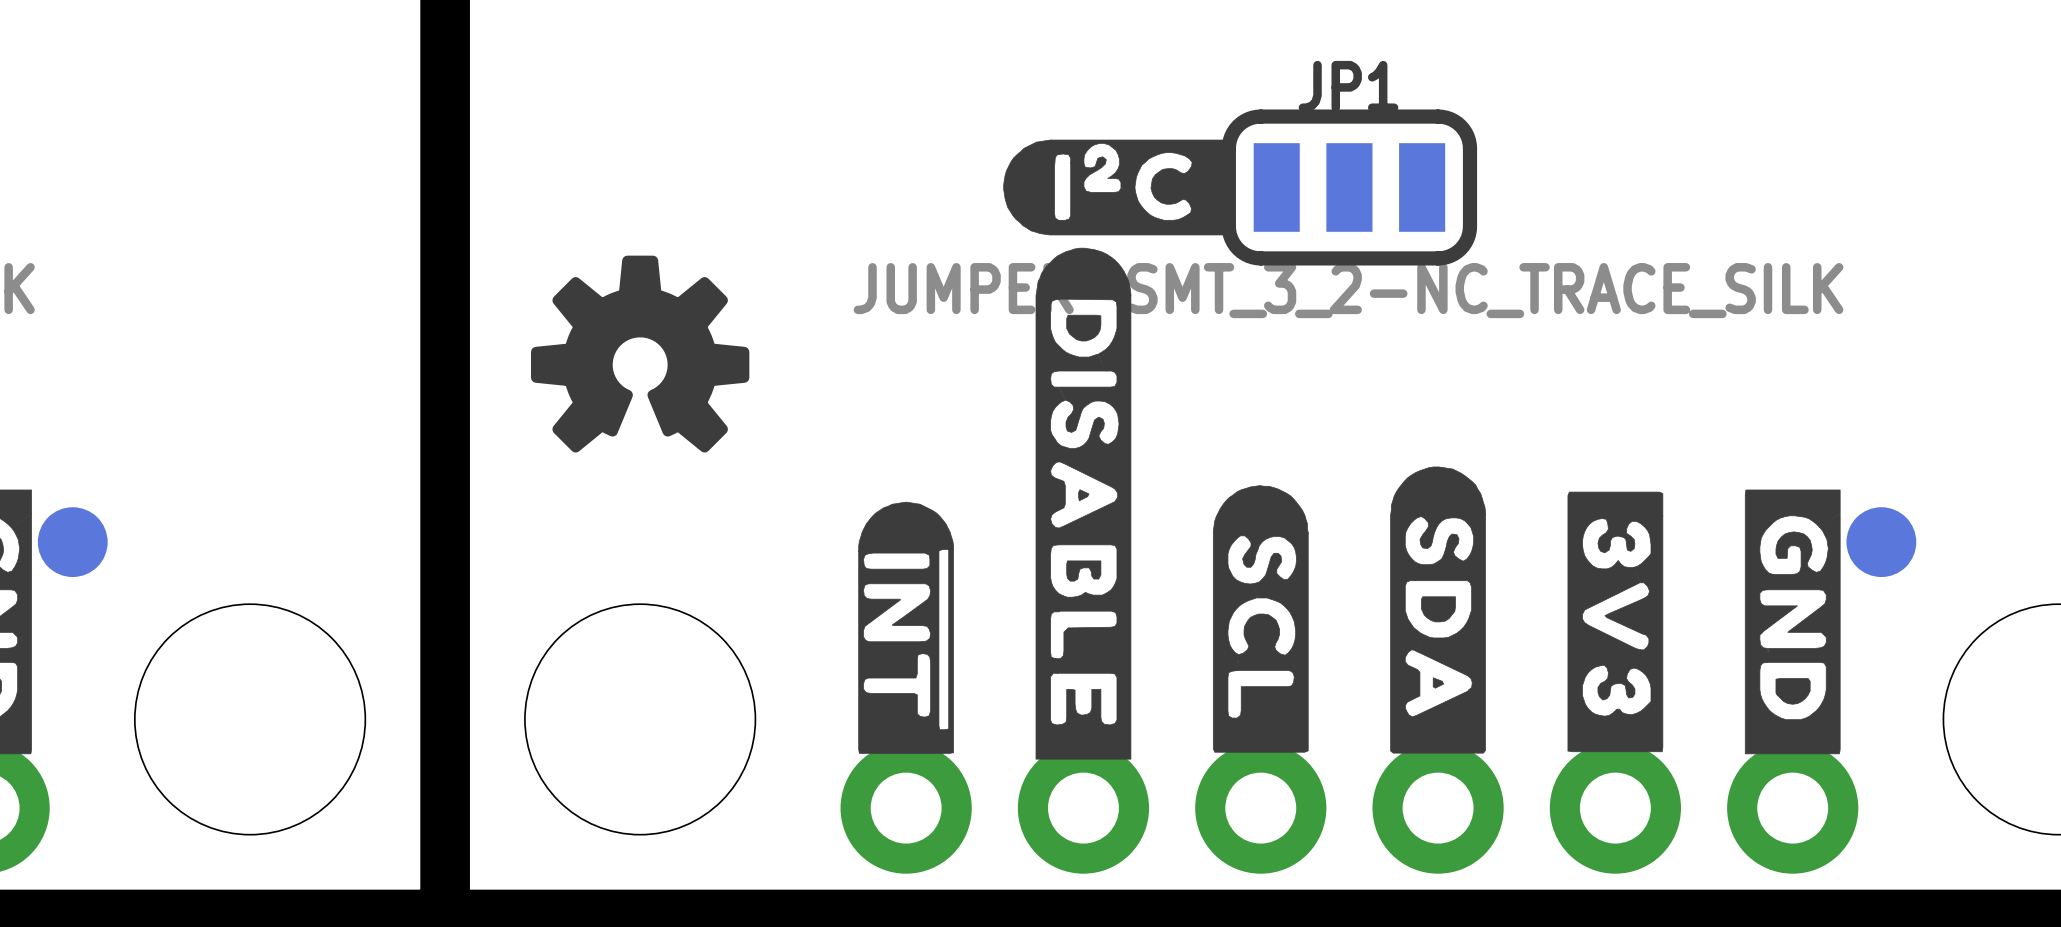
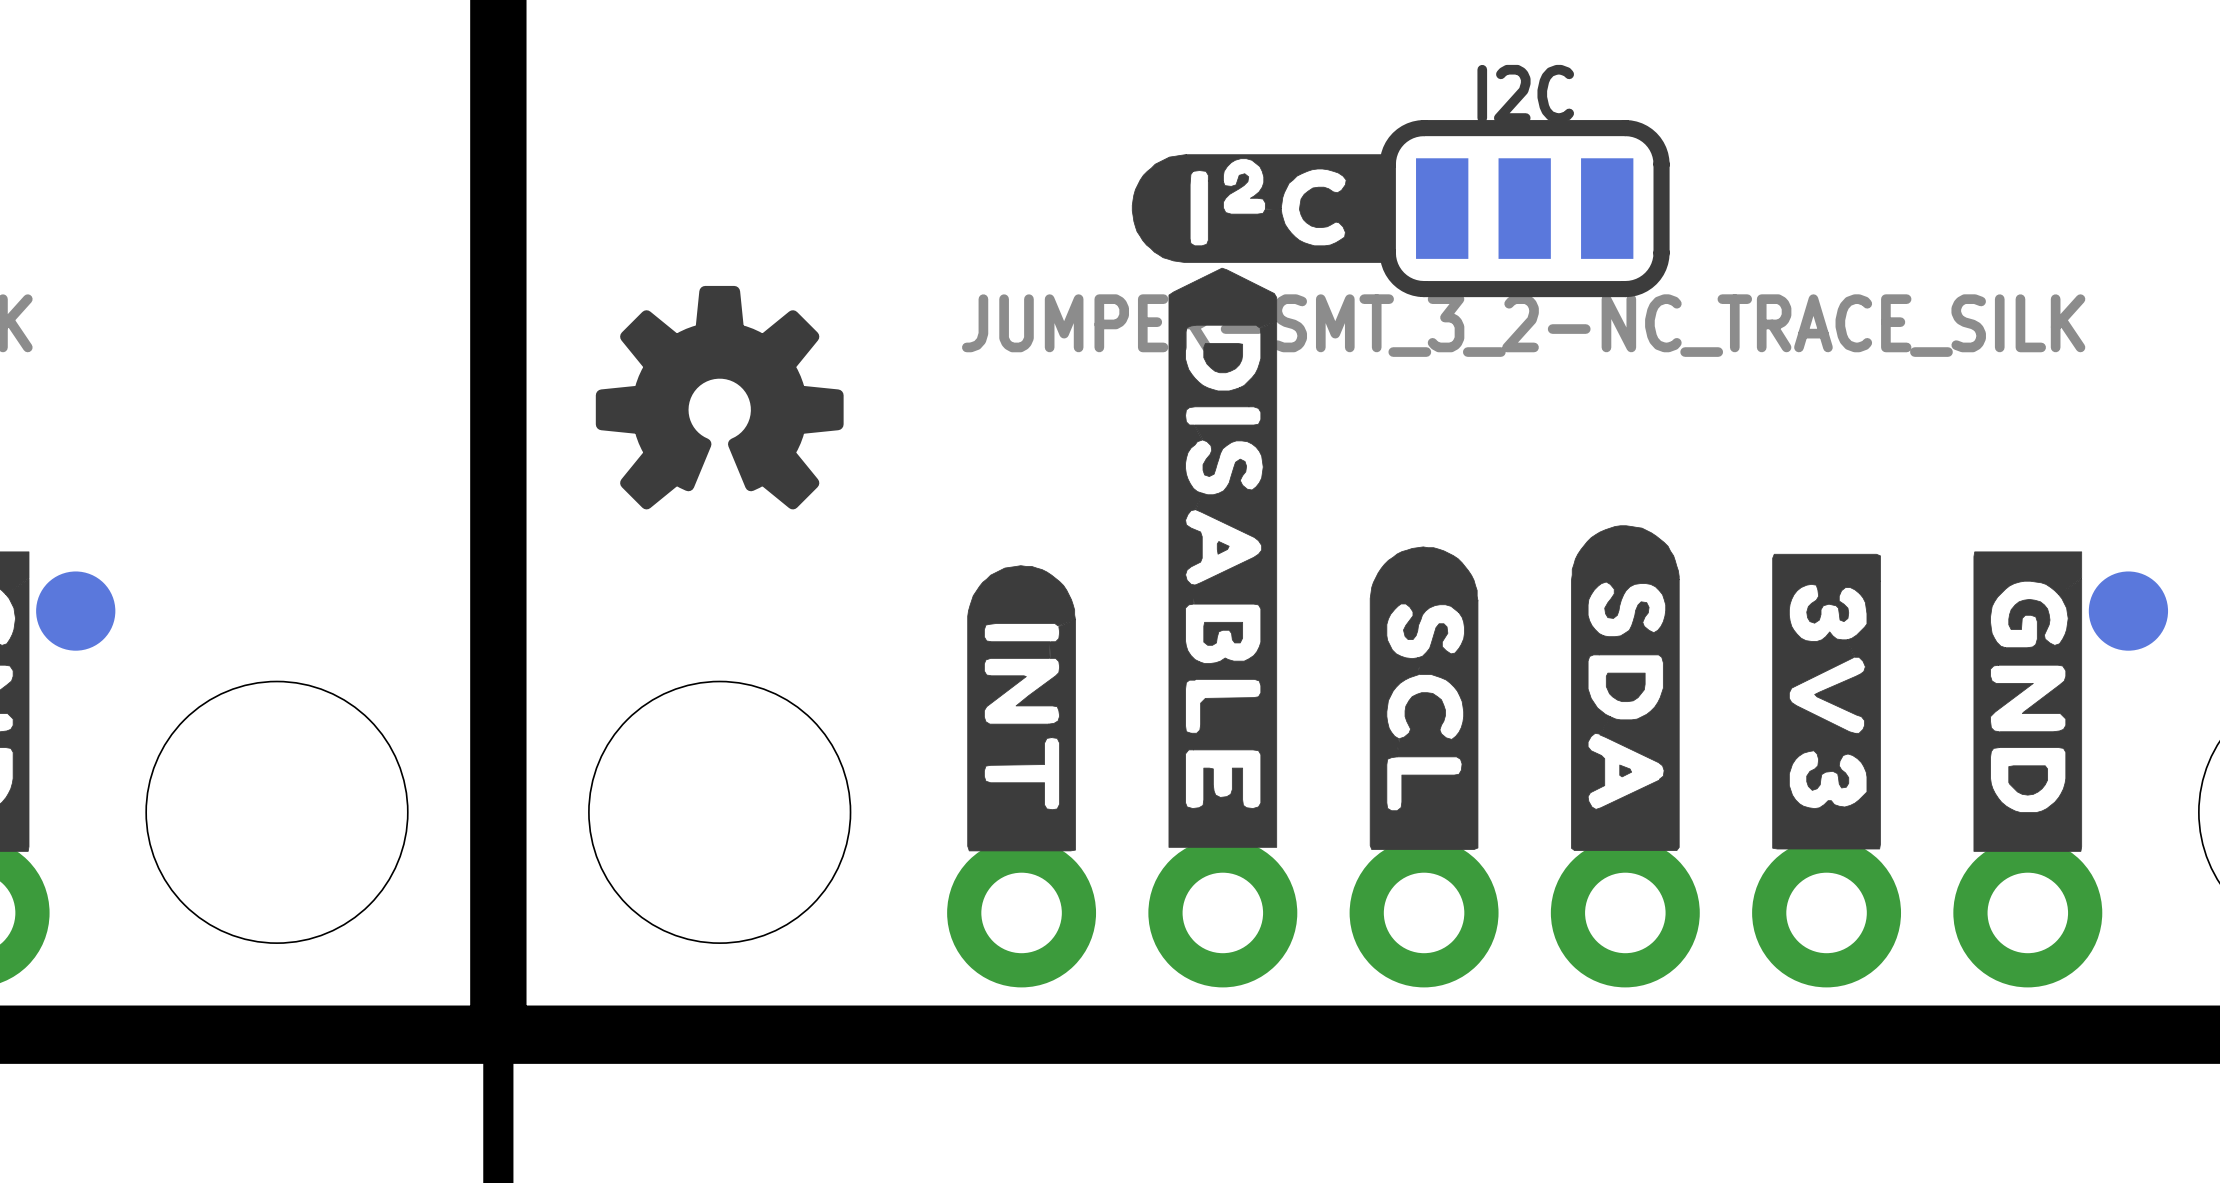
JP1 name: JP1 (1348, 86) -> I2C (1525, 93)
drawing shape: [1035, 247, 1132, 760] -> [1168, 267, 1278, 848]
drawing shape: [858, 501, 954, 754] -> [967, 565, 1076, 852]

